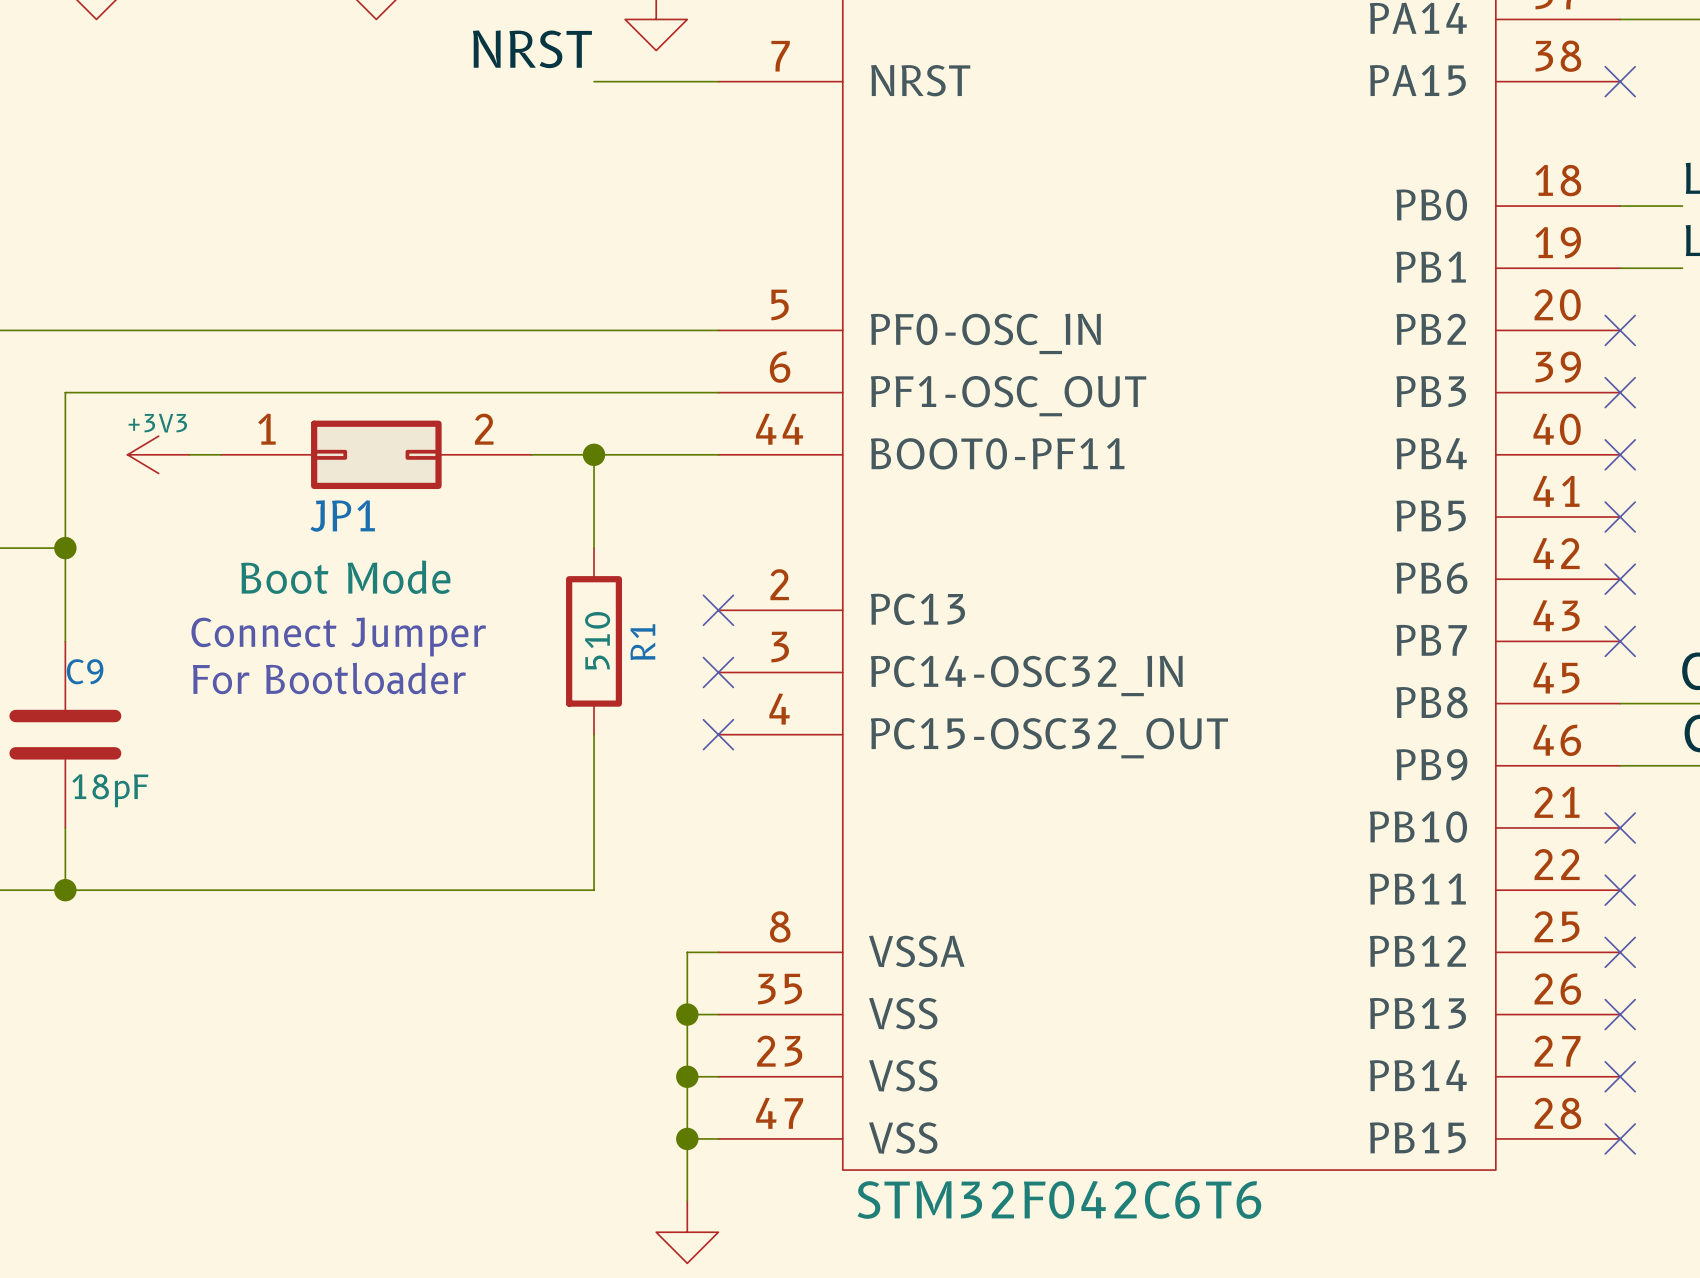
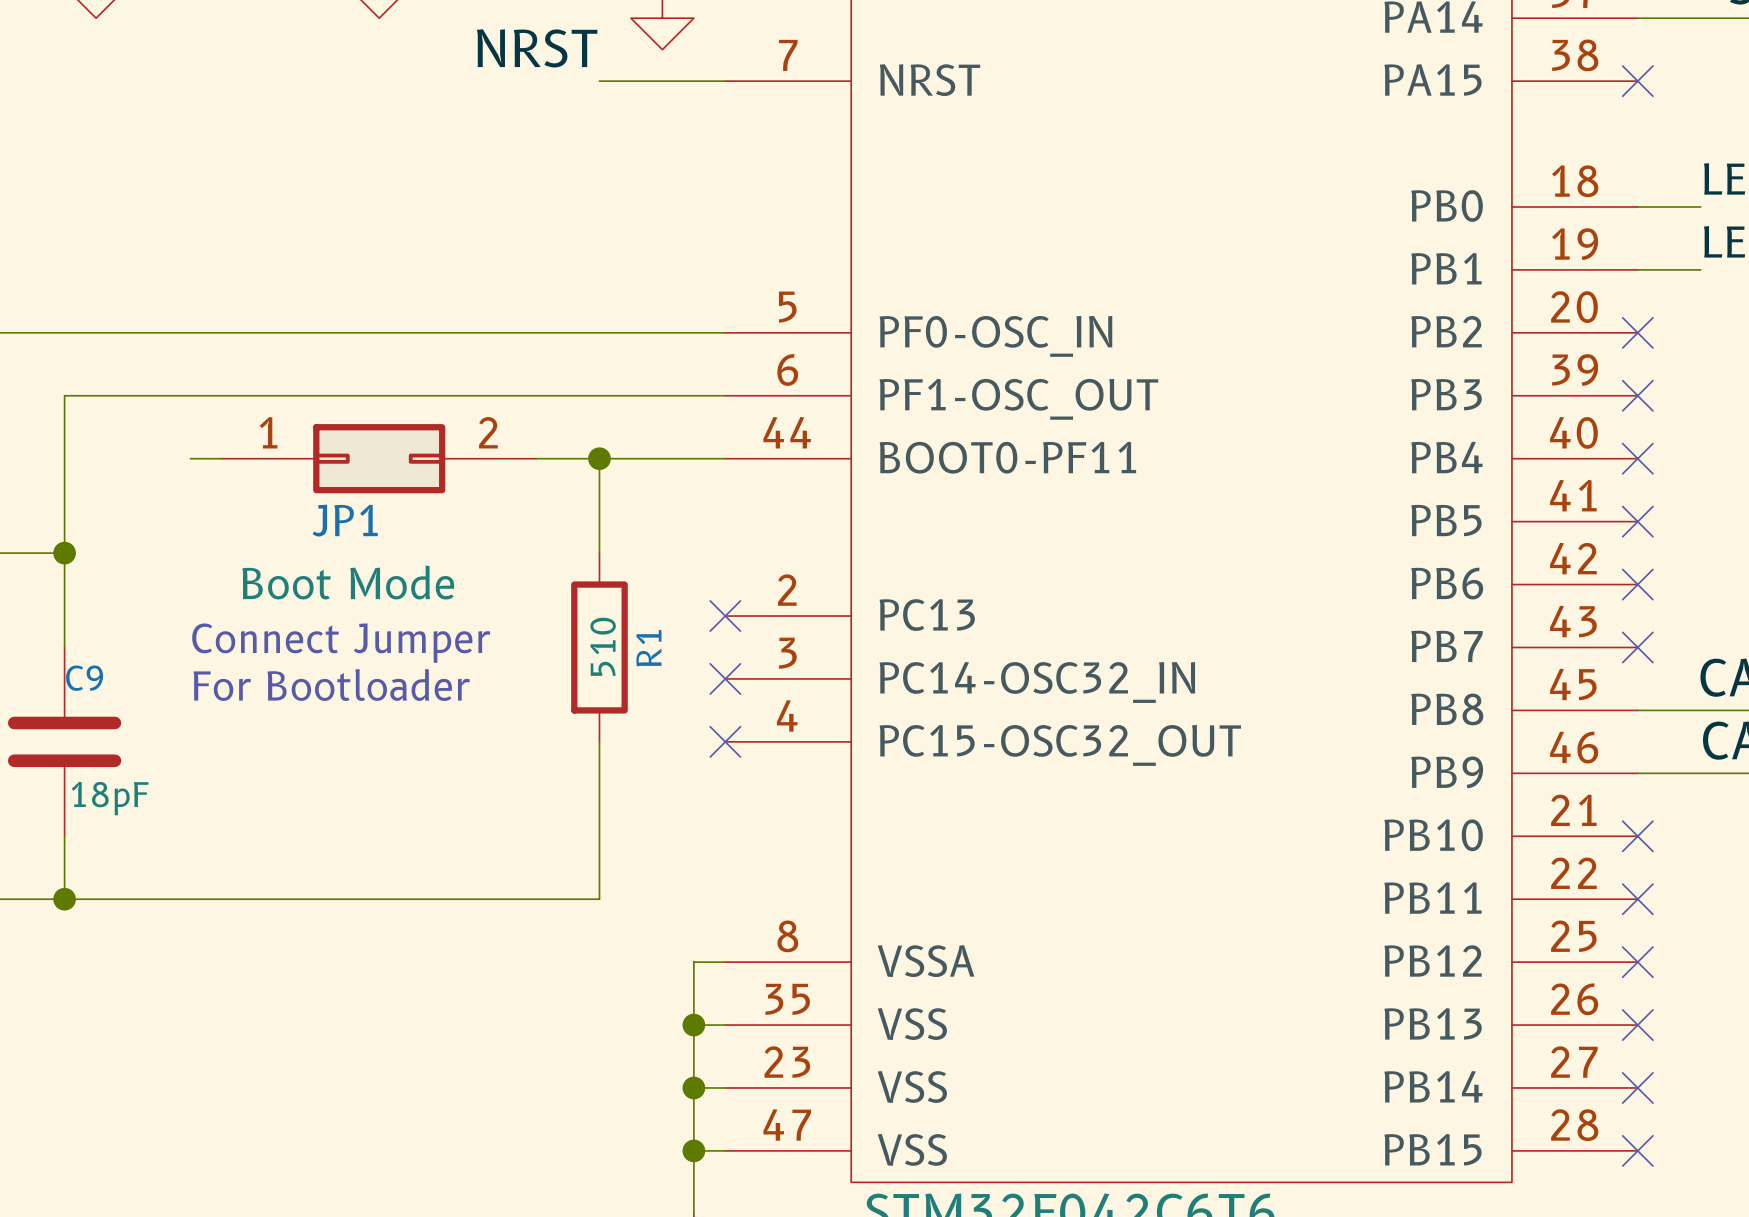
power symbol: +3V3 (158, 454) -> none

